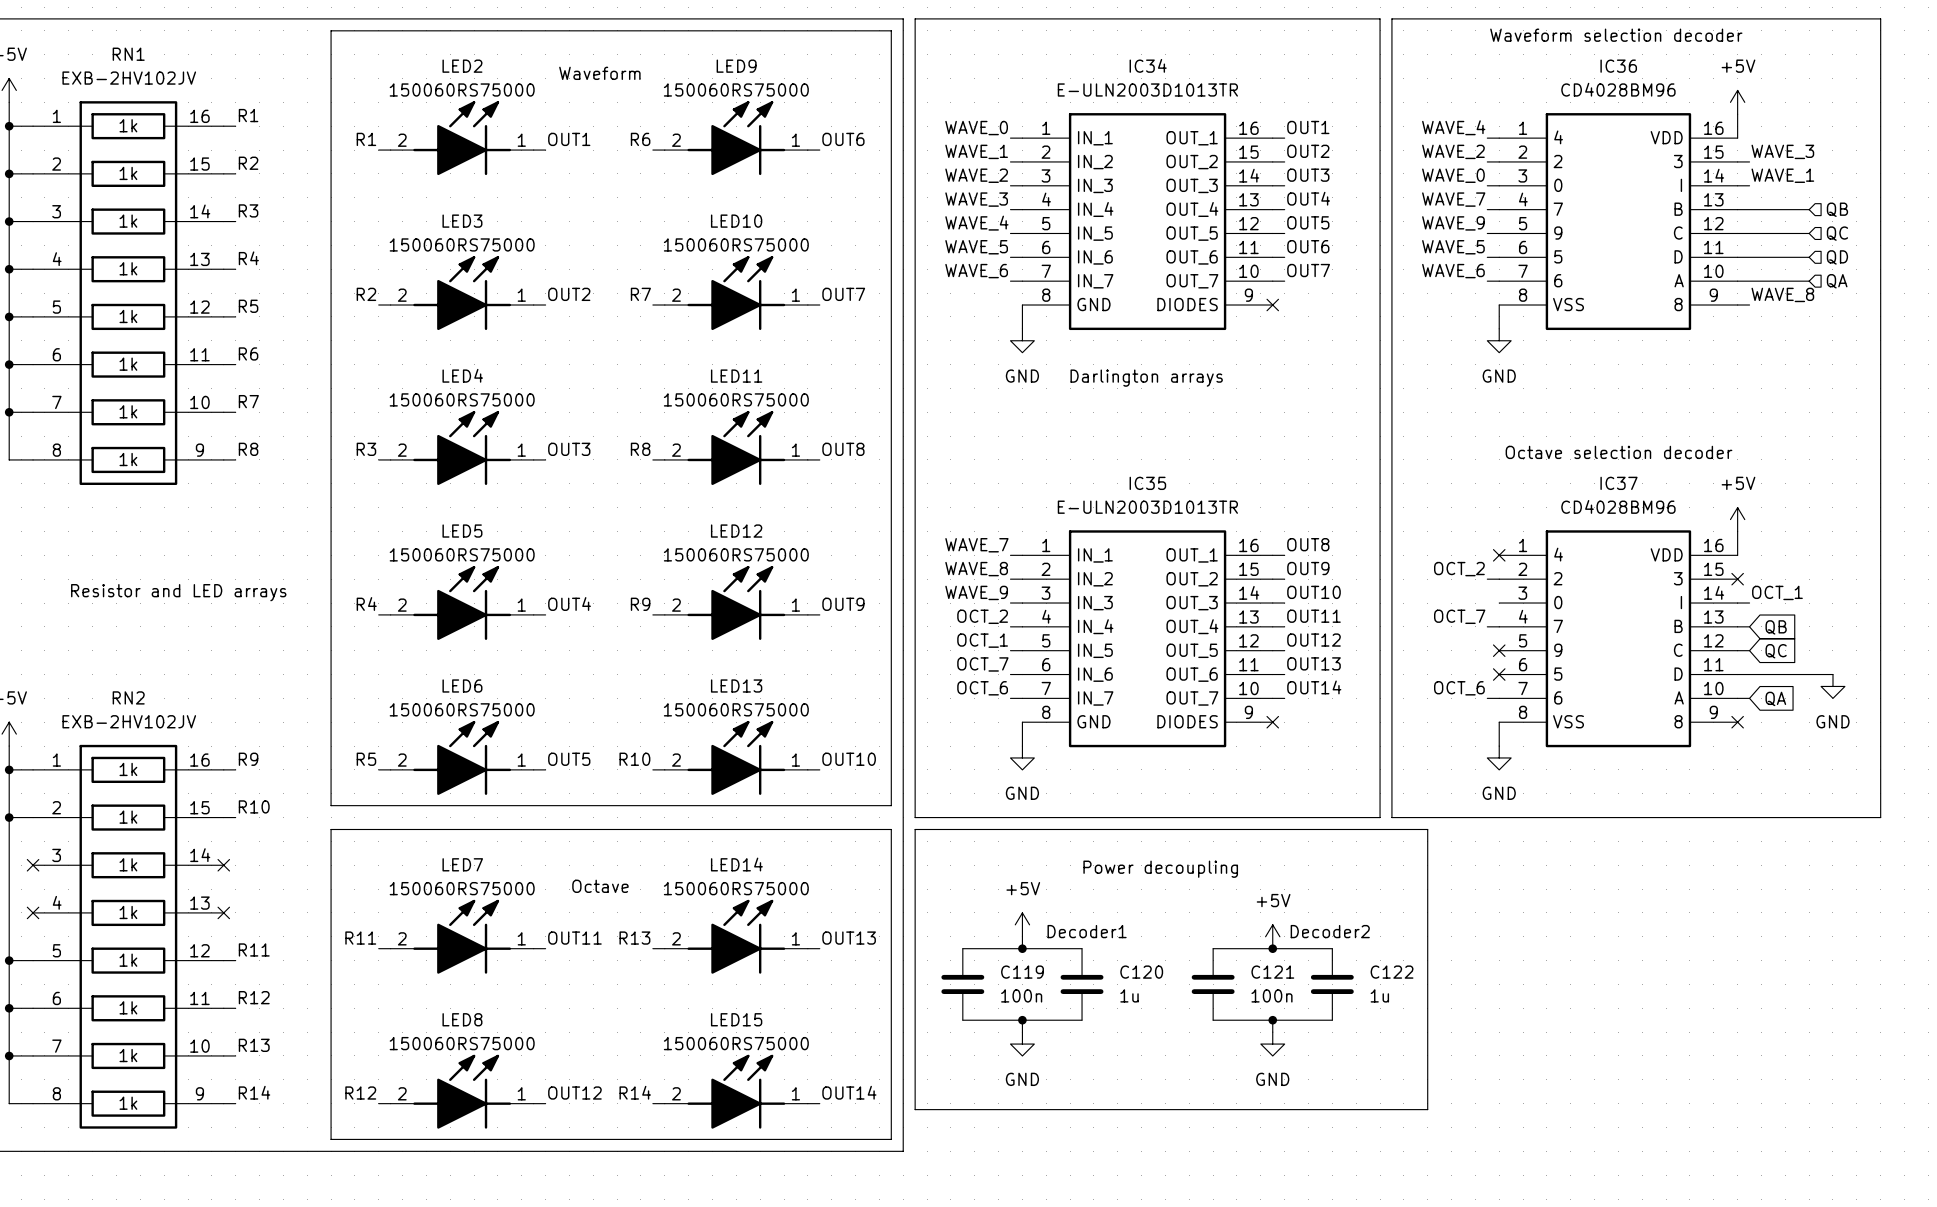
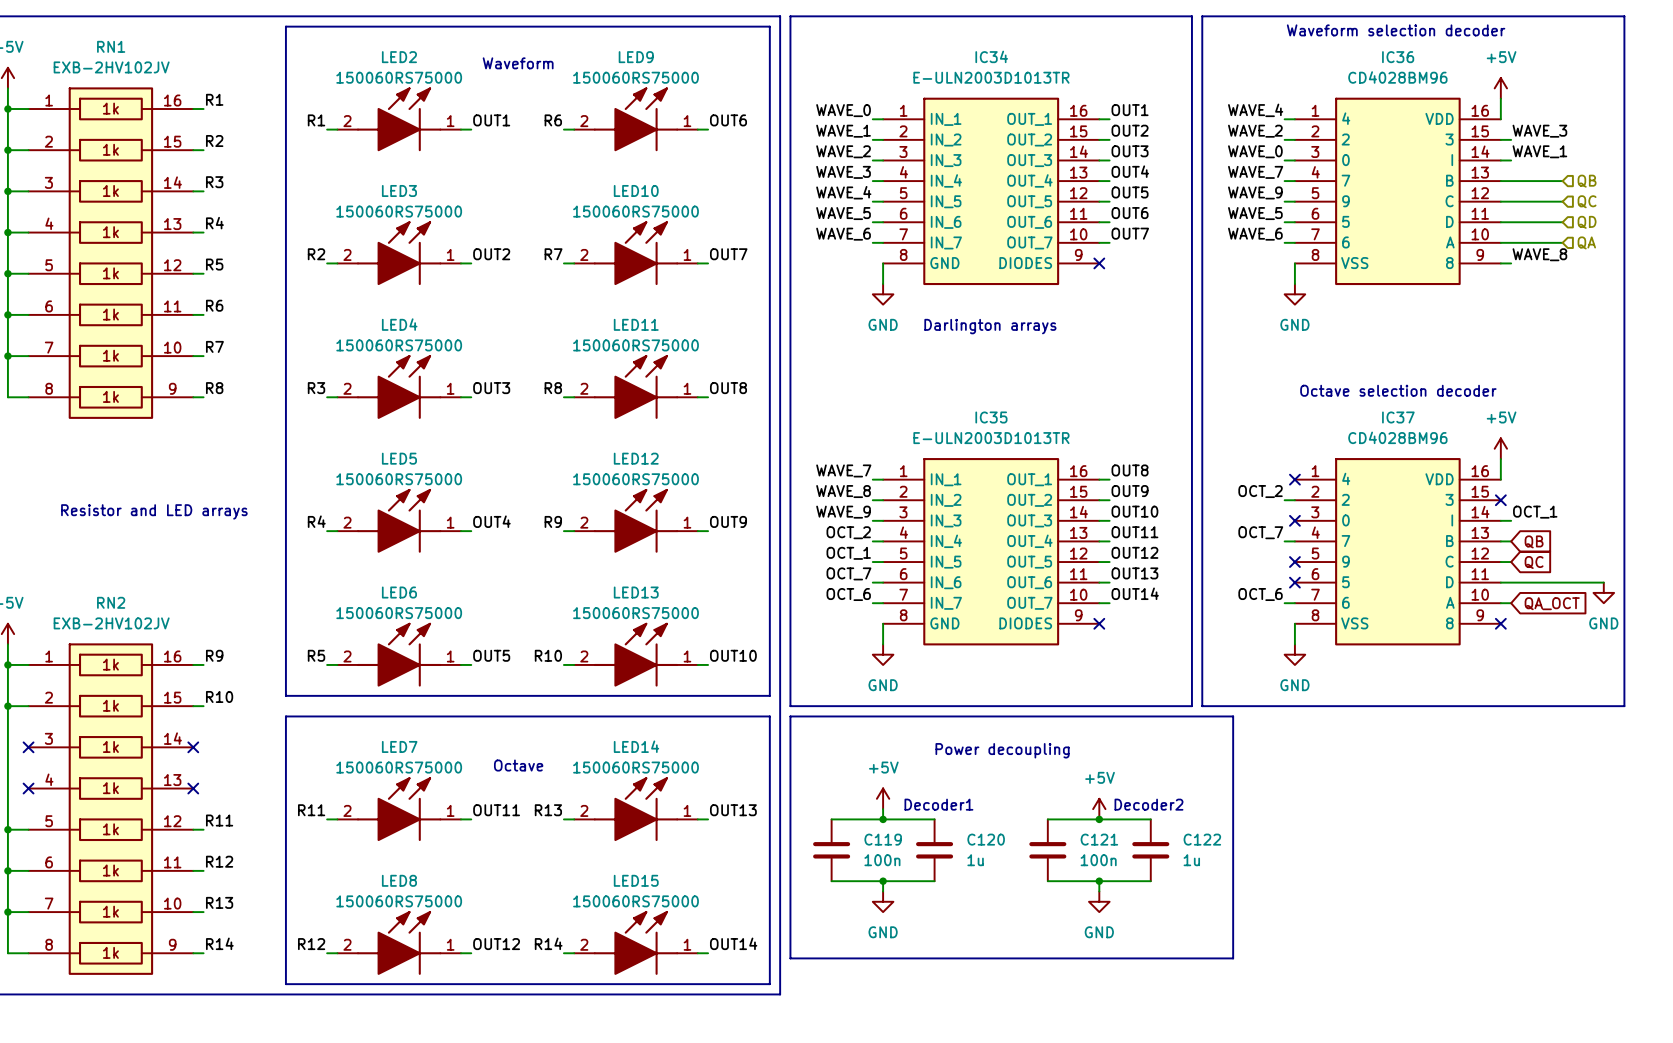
no-connect mark: none -> (1294, 520)
wire: none -> (1583, 582) (1603, 582)
power symbol position: GND (1832, 686) -> GND (1603, 592)
global label: QA (1775, 698) -> QA_OCT (1552, 603)

